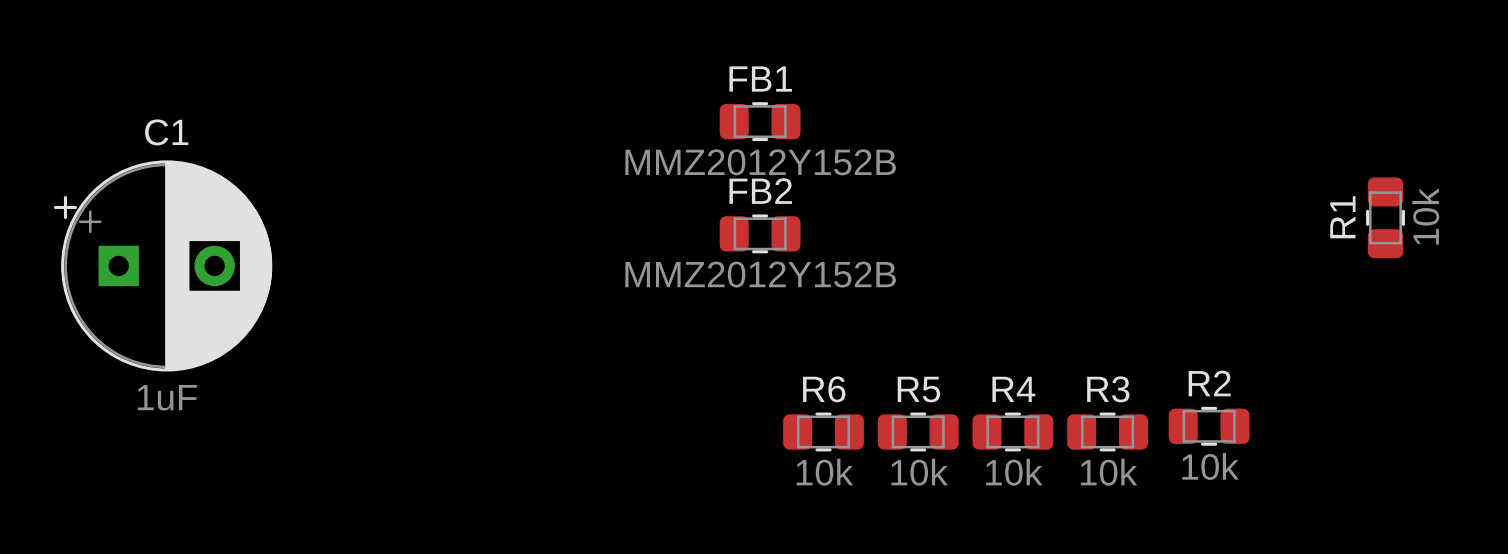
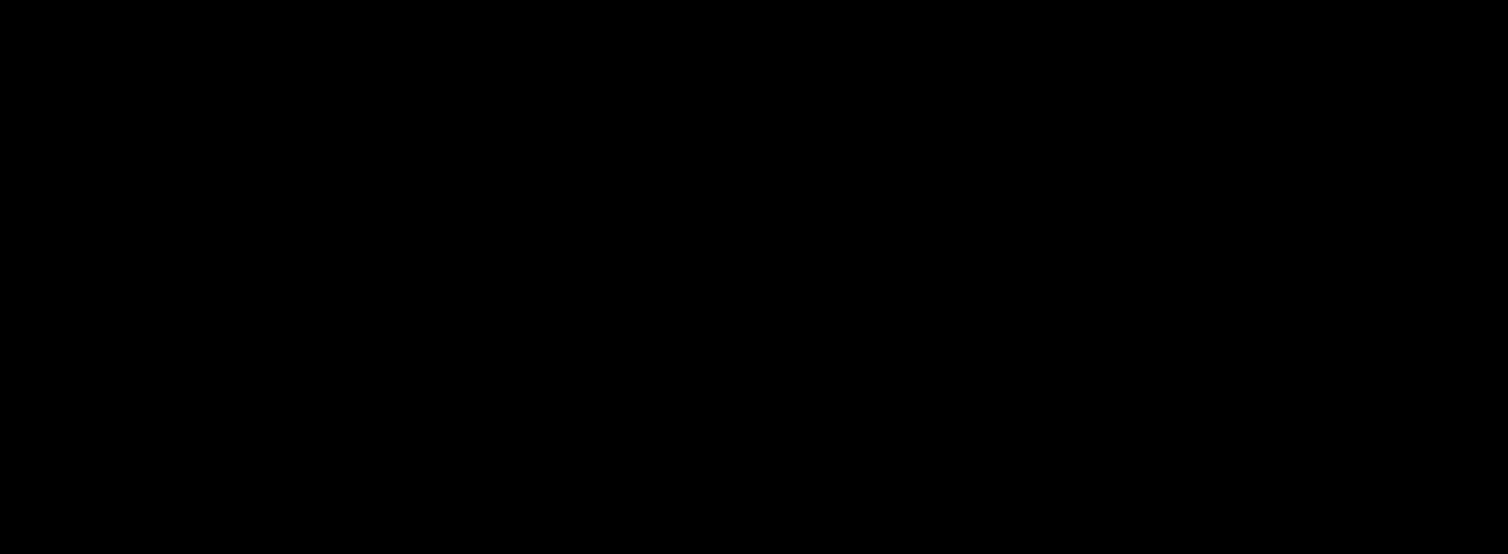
FB1: MMZ2012Y152B (760, 121) -> none
R1: 10k (1385, 217) -> none
FB2: MMZ2012Y152B (760, 233) -> none
C1: 1uF (163, 265) -> none
R2: 10k (1209, 426) -> none
R6: 10k (823, 431) -> none
R5: 10k (918, 431) -> none
R4: 10k (1012, 431) -> none
R3: 10k (1107, 431) -> none

